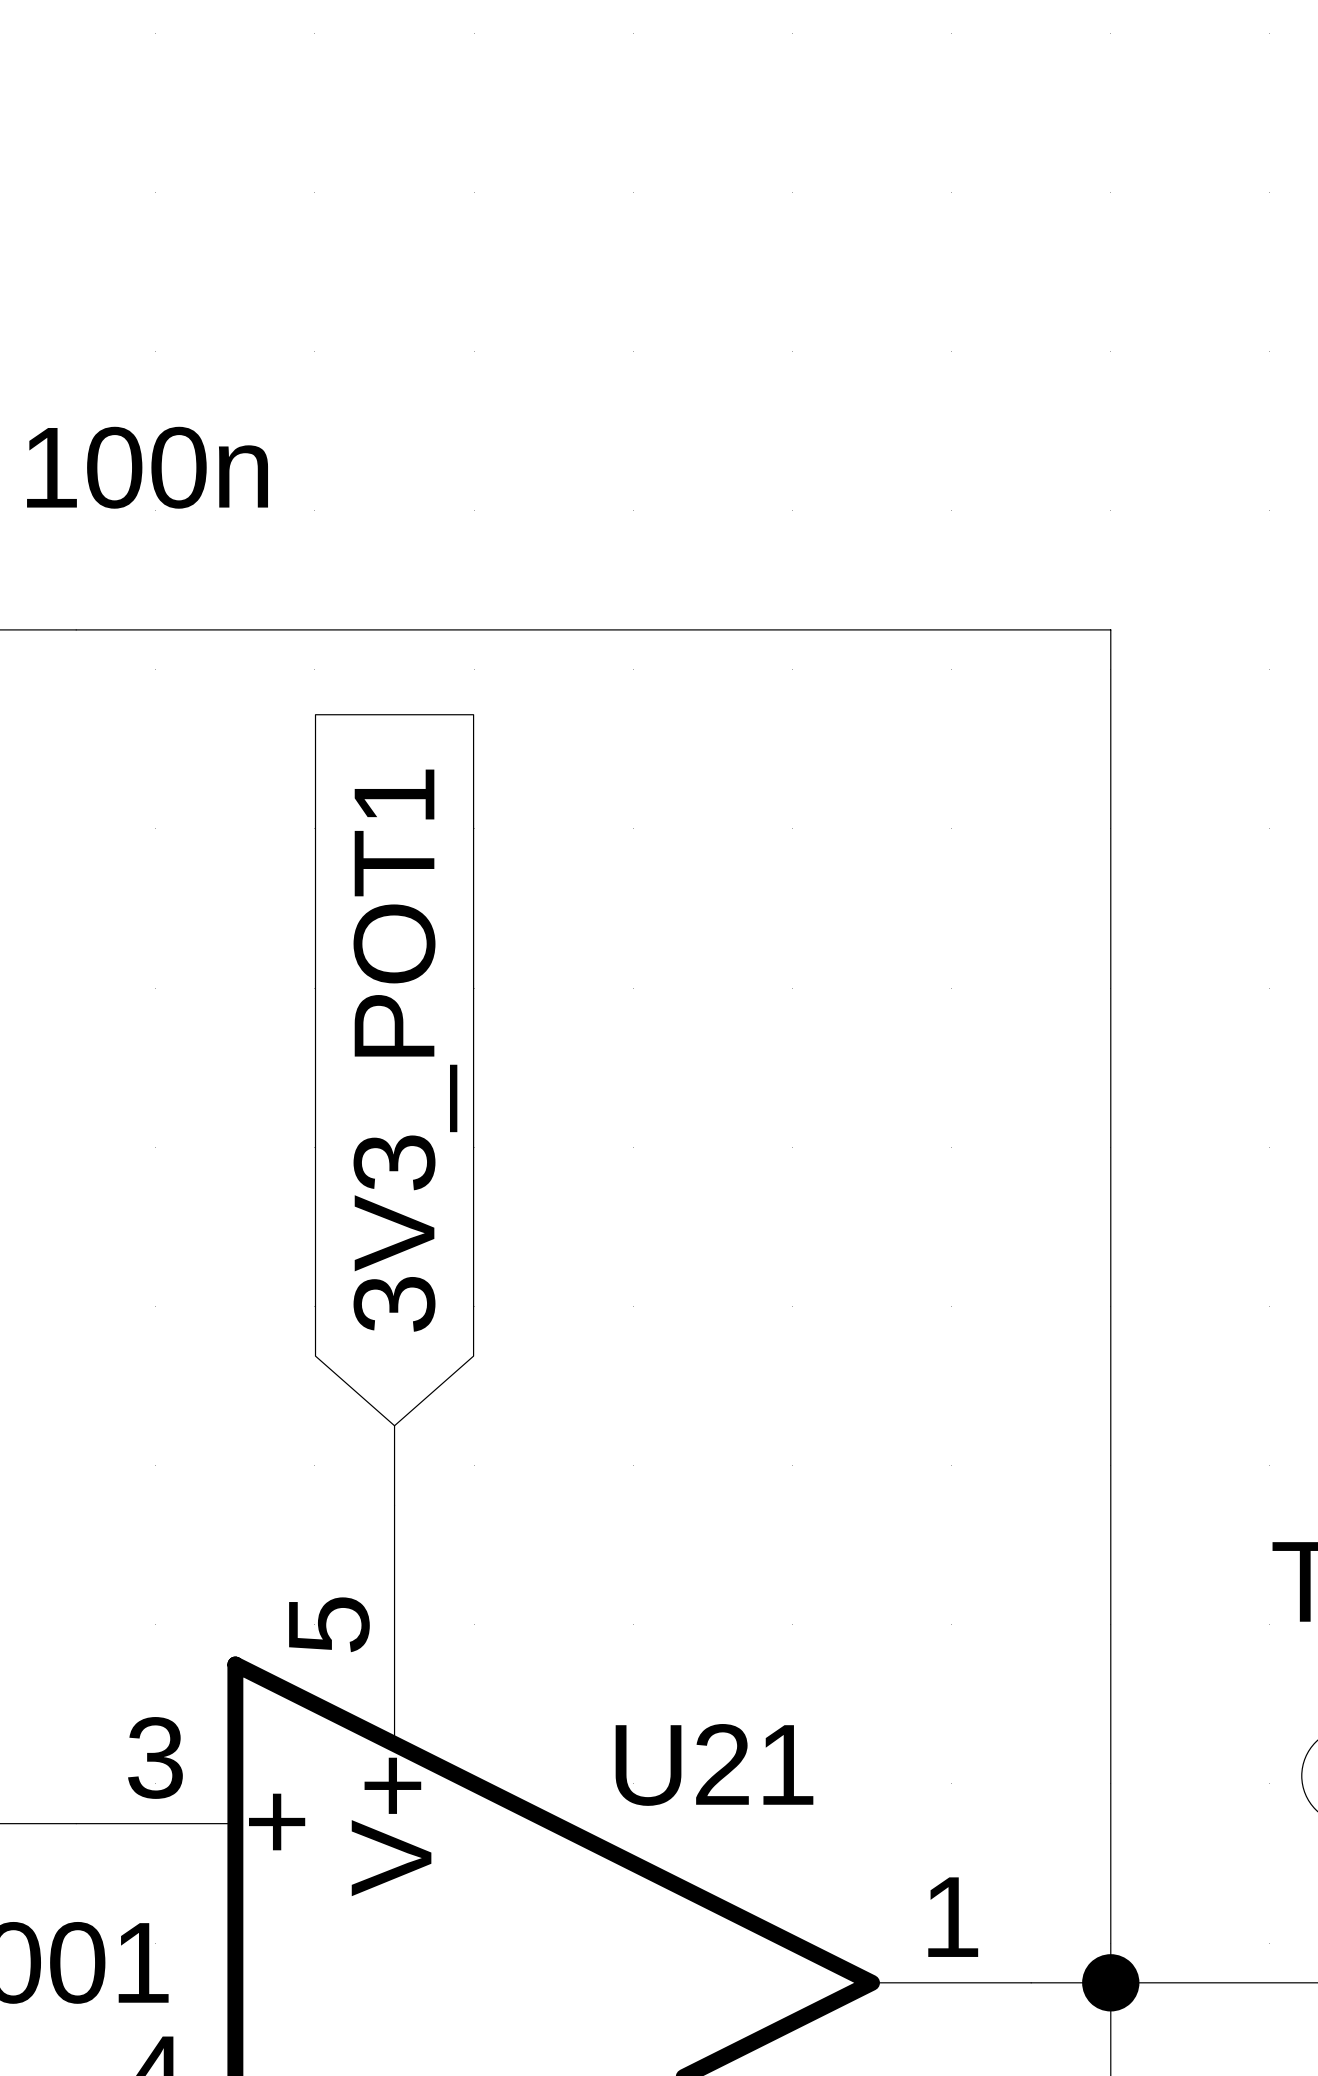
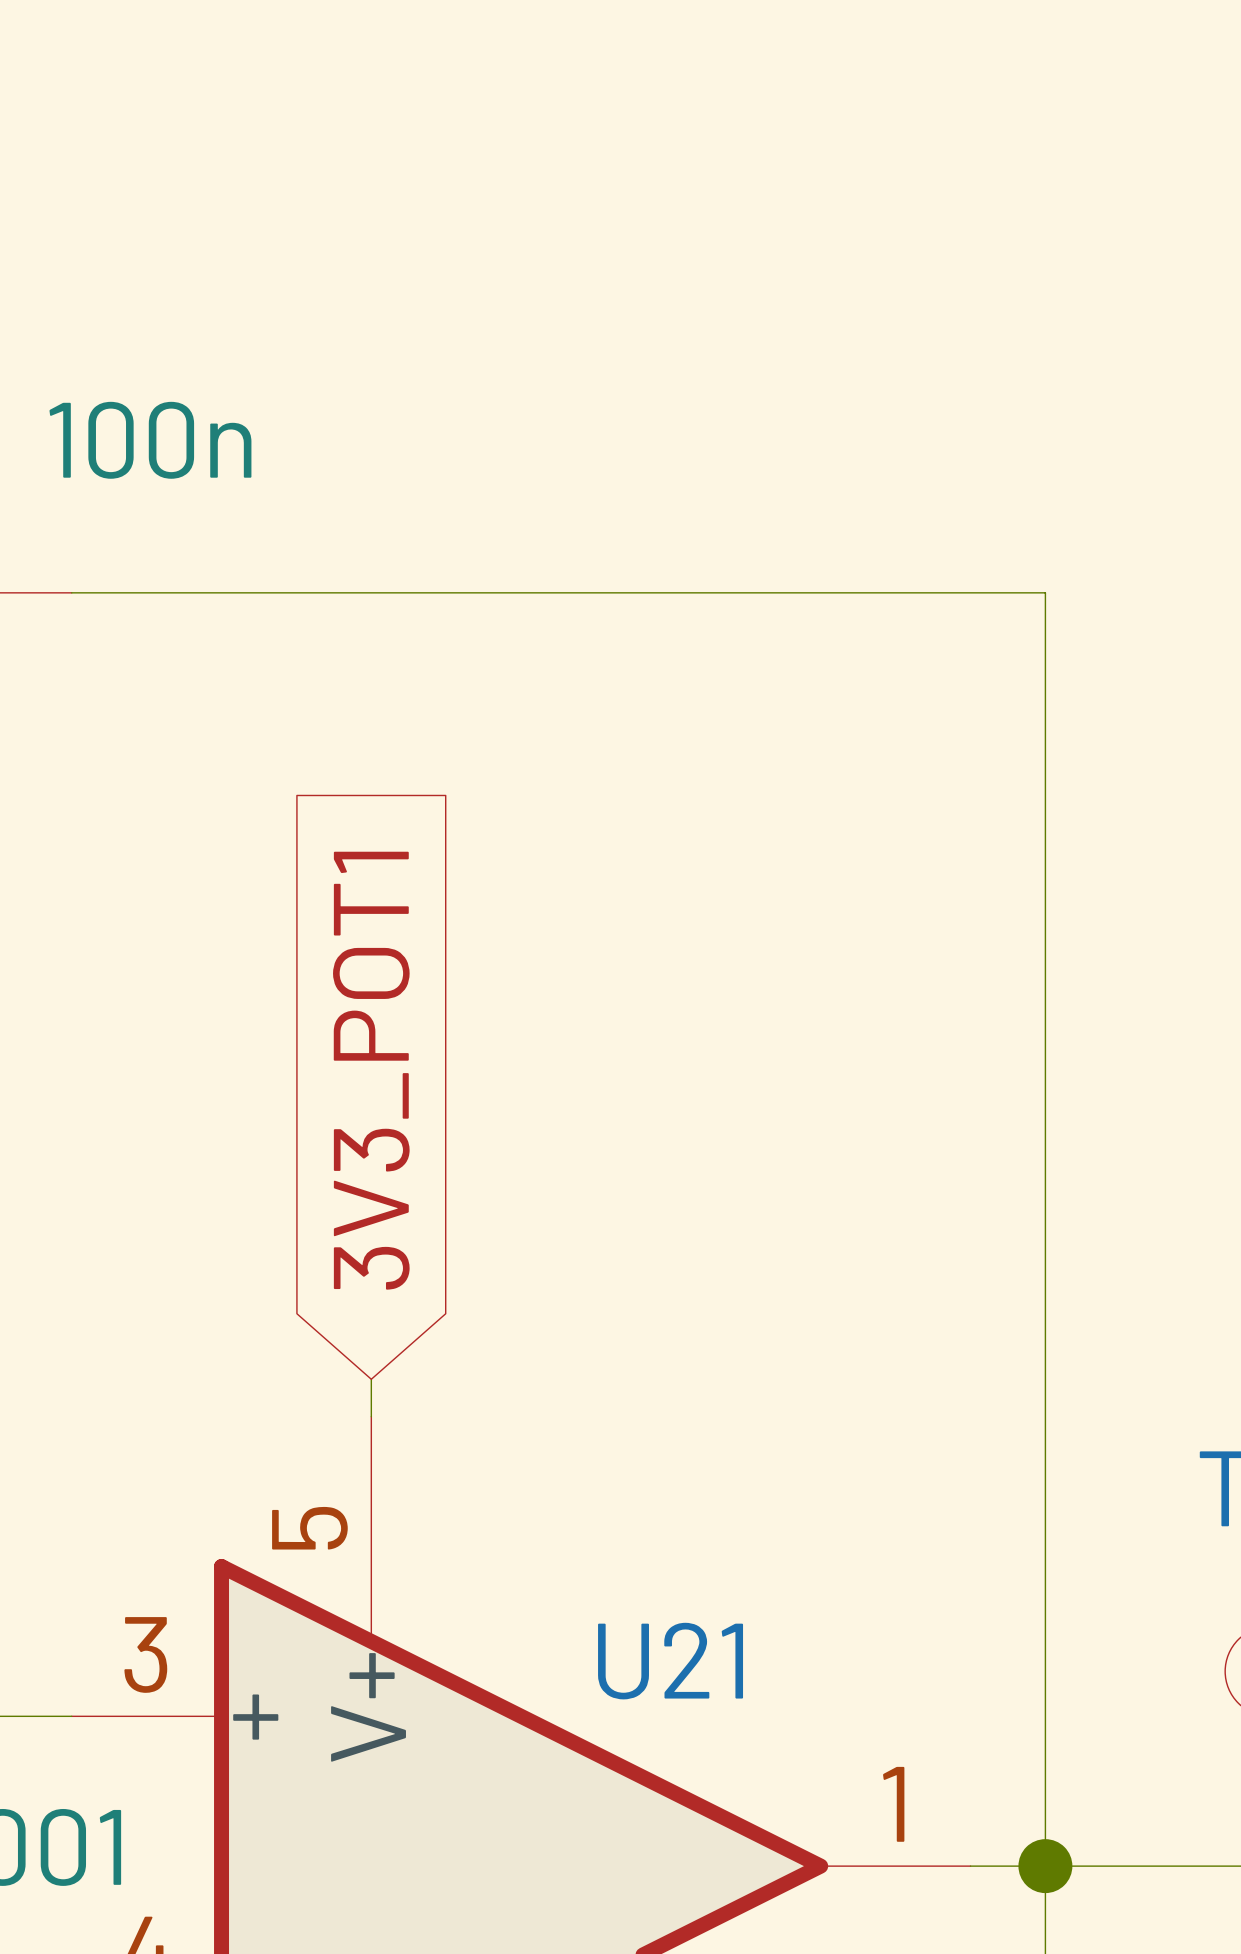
global label position: 3V3_POT1 (405, 1050) -> 3V3_POT1 (371, 1070)
wire: (394, 1425) (394, 1465) -> none

